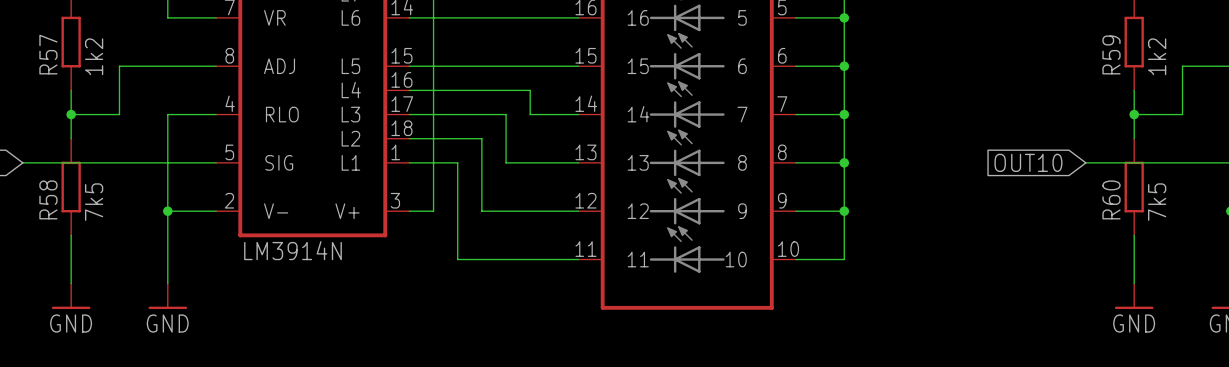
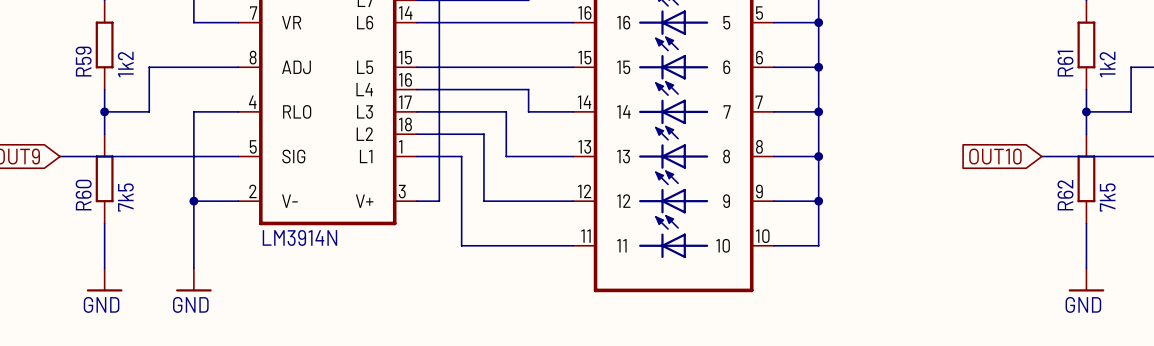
R57 name: R57 (48, 54) -> R59 (83, 61)
R59 name: R59 (1111, 54) -> R61 (1065, 63)
R58 name: R58 (48, 199) -> R60 (83, 195)
R60 name: R60 (1111, 199) -> R62 (1065, 195)

